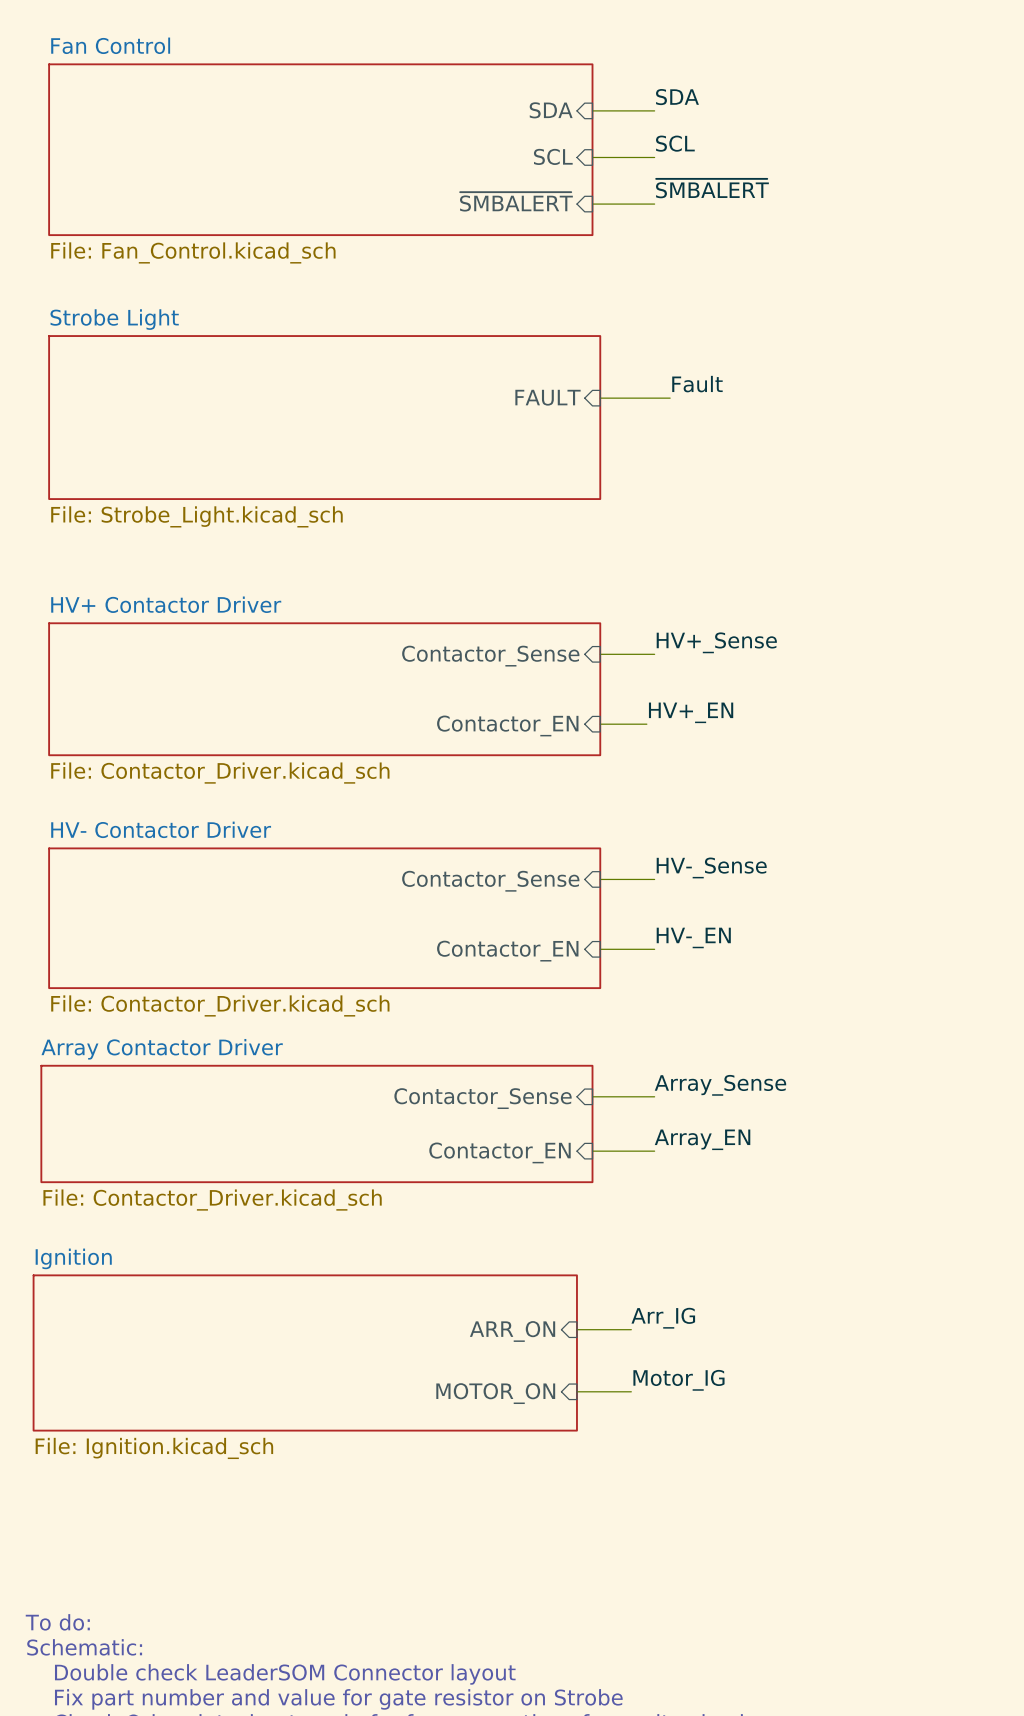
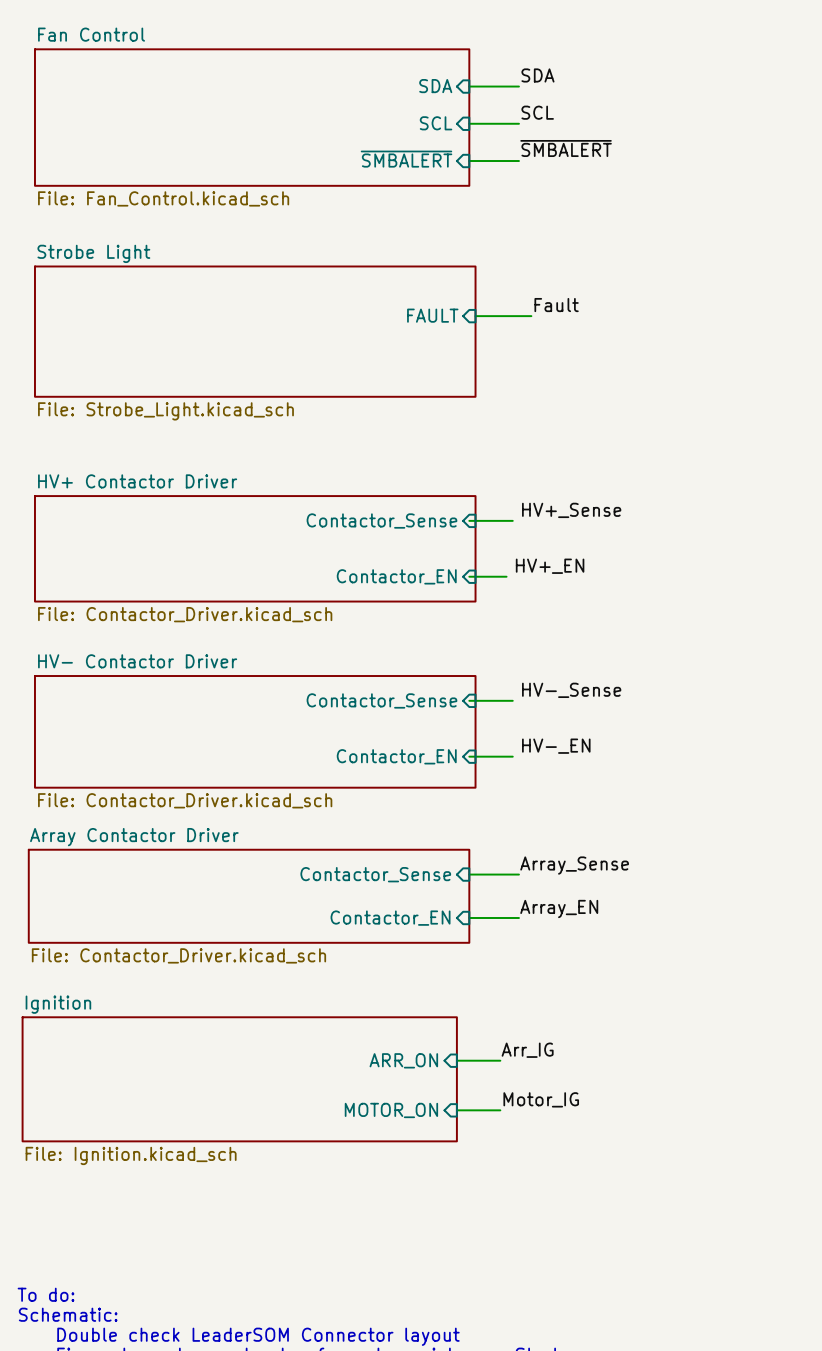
wire: (646, 654) (654, 654) -> (469, 520) (475, 520)
wire: (639, 724) (646, 724) -> (469, 576) (475, 576)
wire: (646, 879) (654, 879) -> (469, 700) (475, 700)
wire: (646, 949) (654, 949) -> (469, 756) (475, 756)

